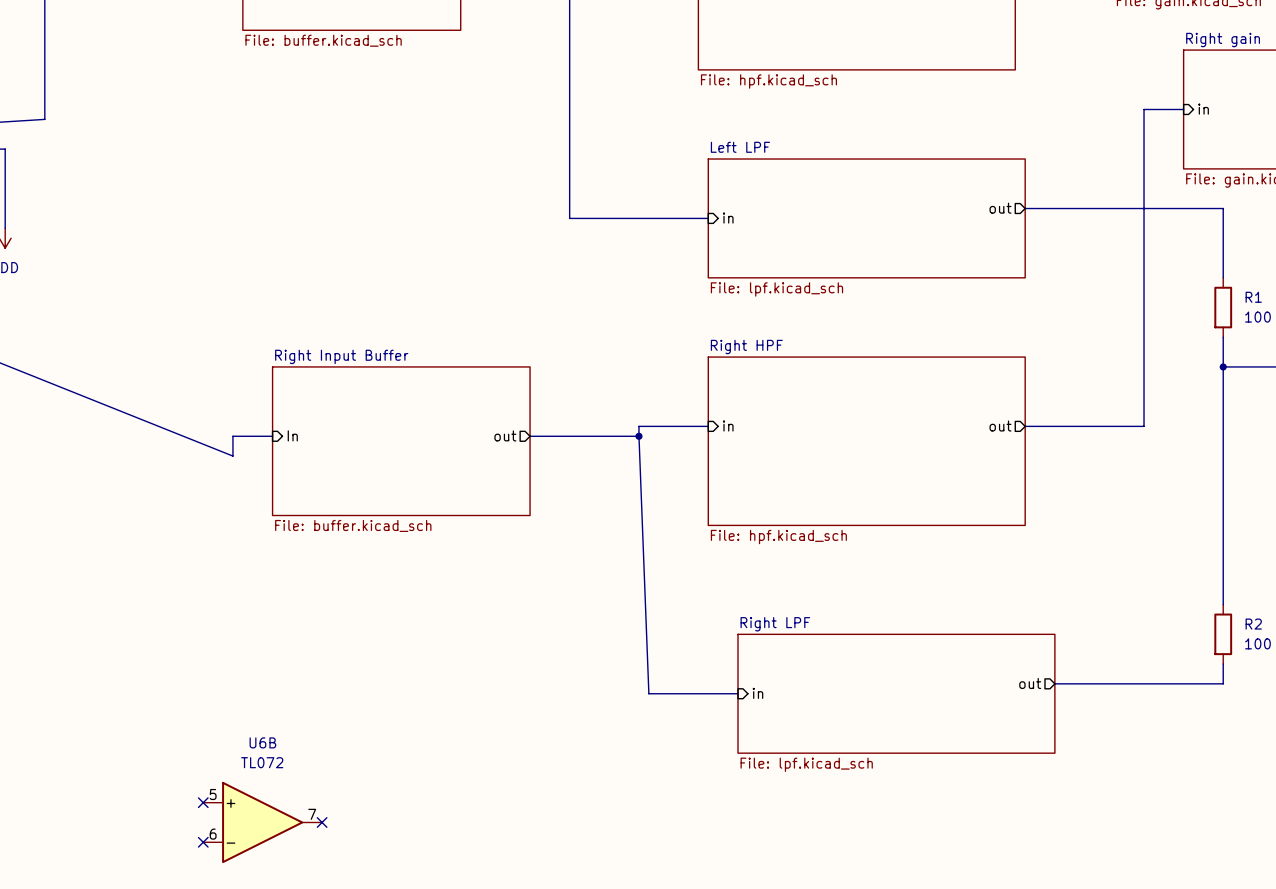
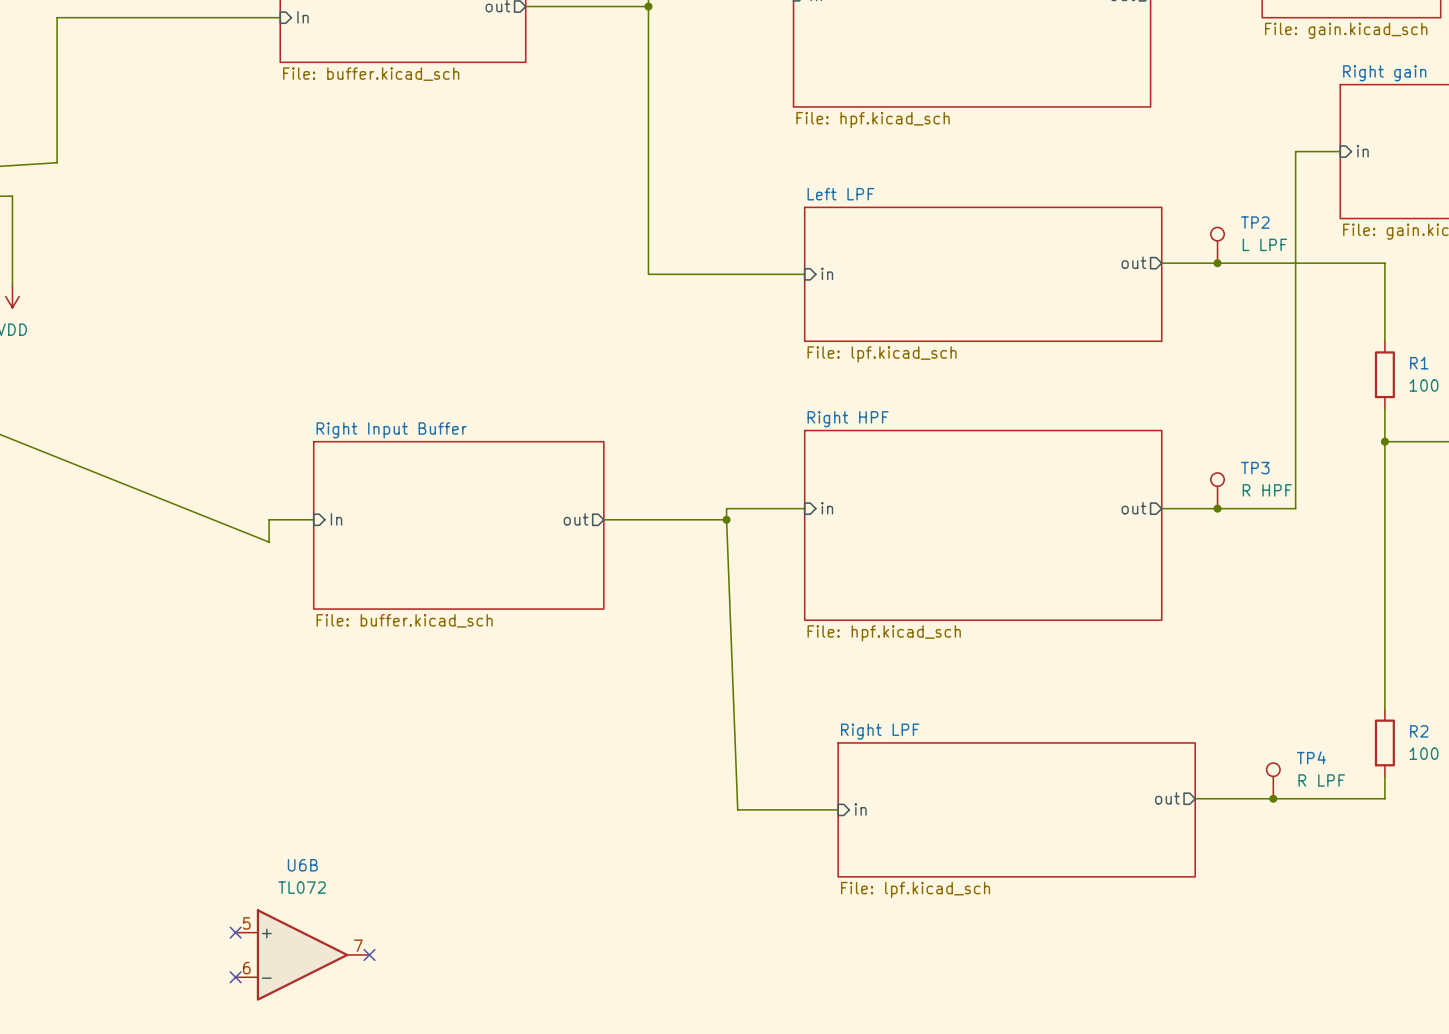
TP2: none -> L LPF (1217, 245)
junction: none -> (1217, 263)
TP3: none -> R HPF (1217, 490)
junction: none -> (1217, 508)
TP4: none -> R LPF (1273, 780)
junction: none -> (1273, 798)

